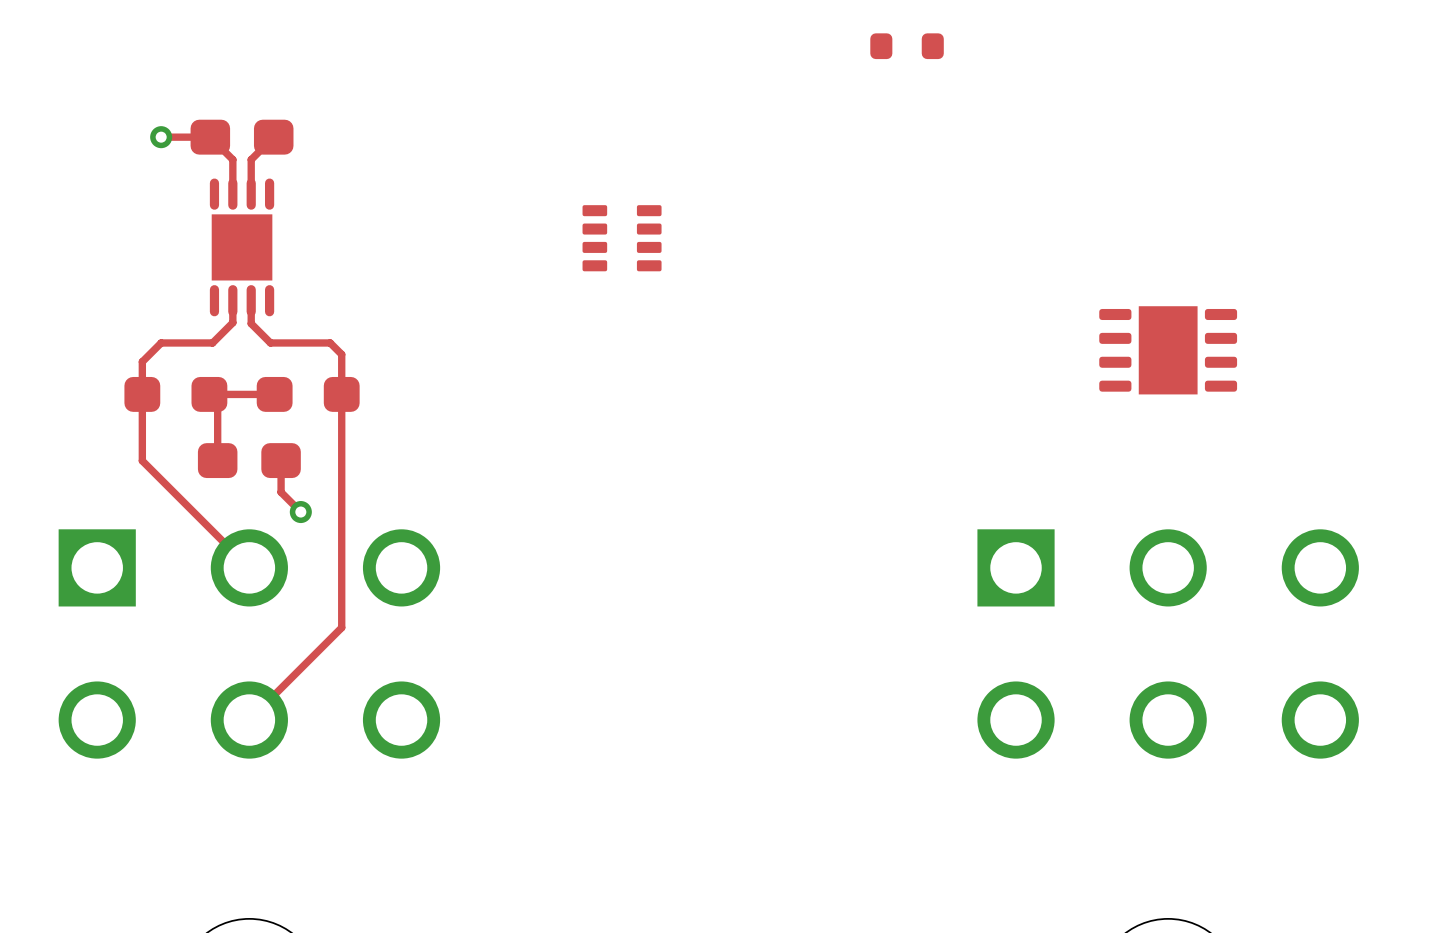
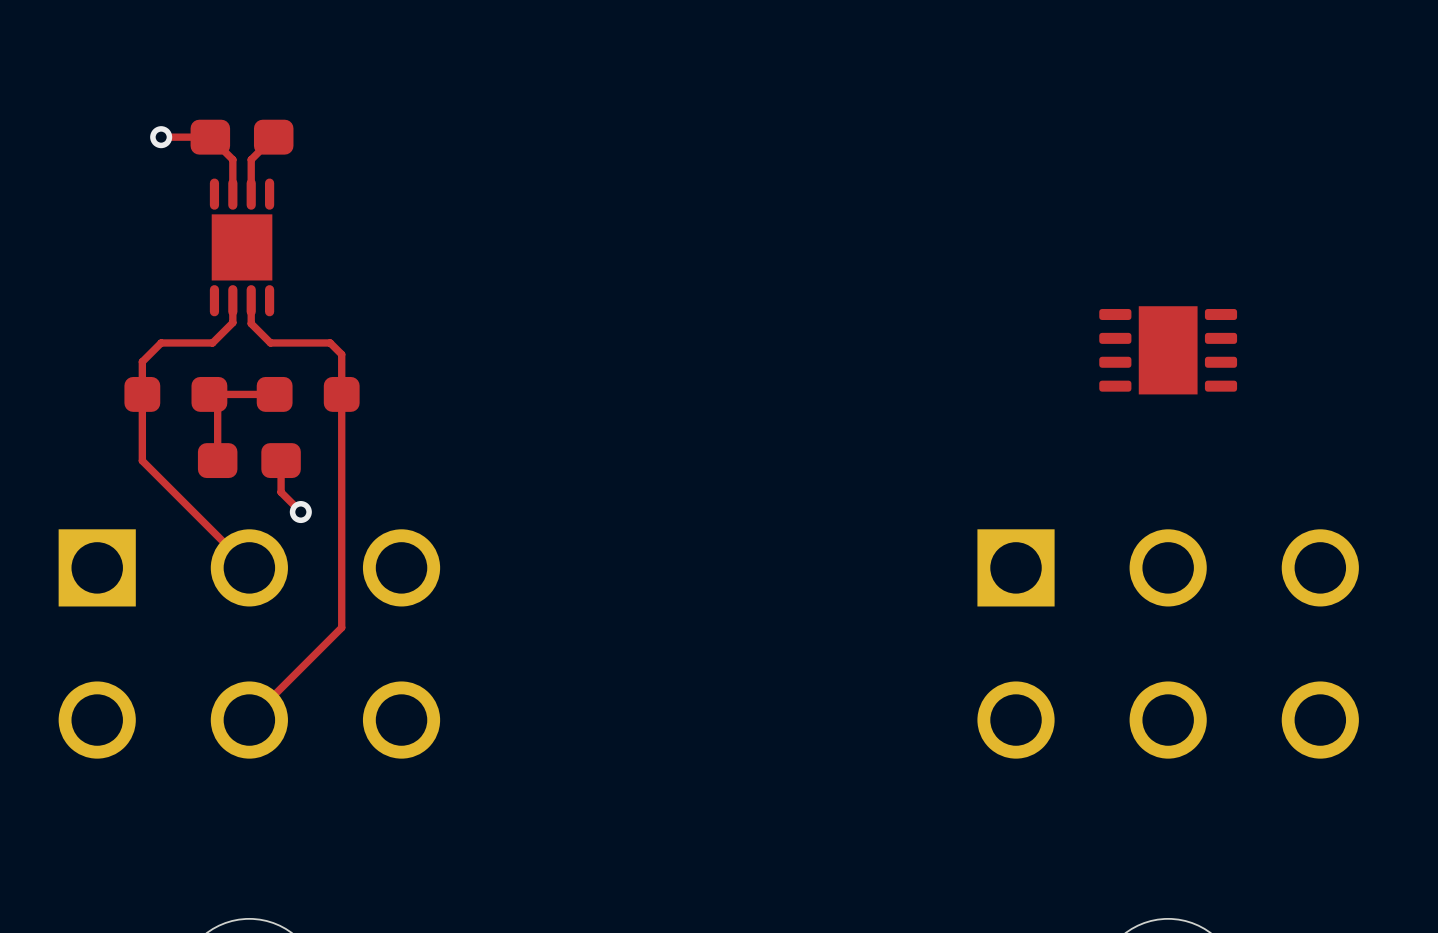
part: (907, 46) -> none
part: (622, 238) -> none

